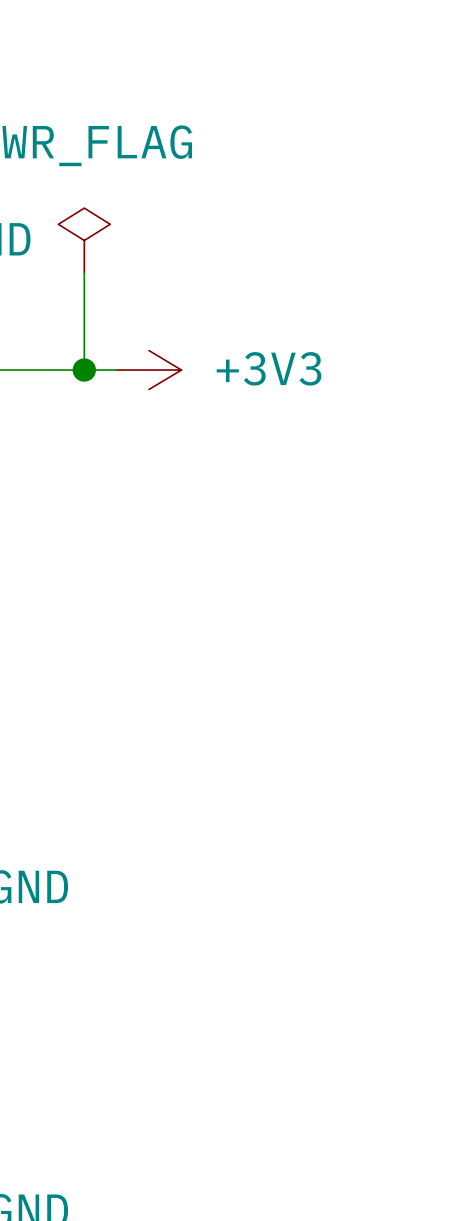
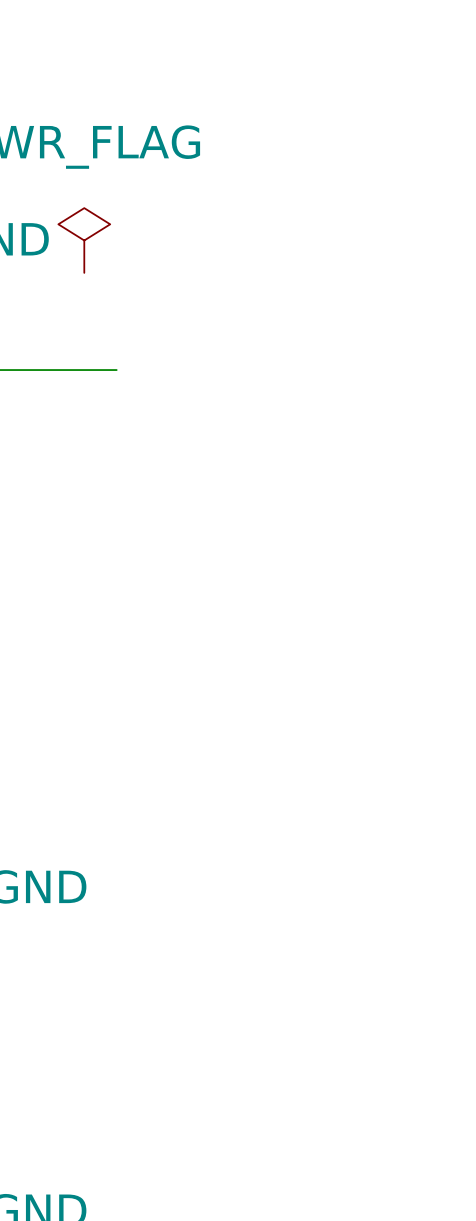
wire: (84, 272) (84, 370) -> none
junction: (84, 370) -> none
power symbol: +3V3 (149, 370) -> none

